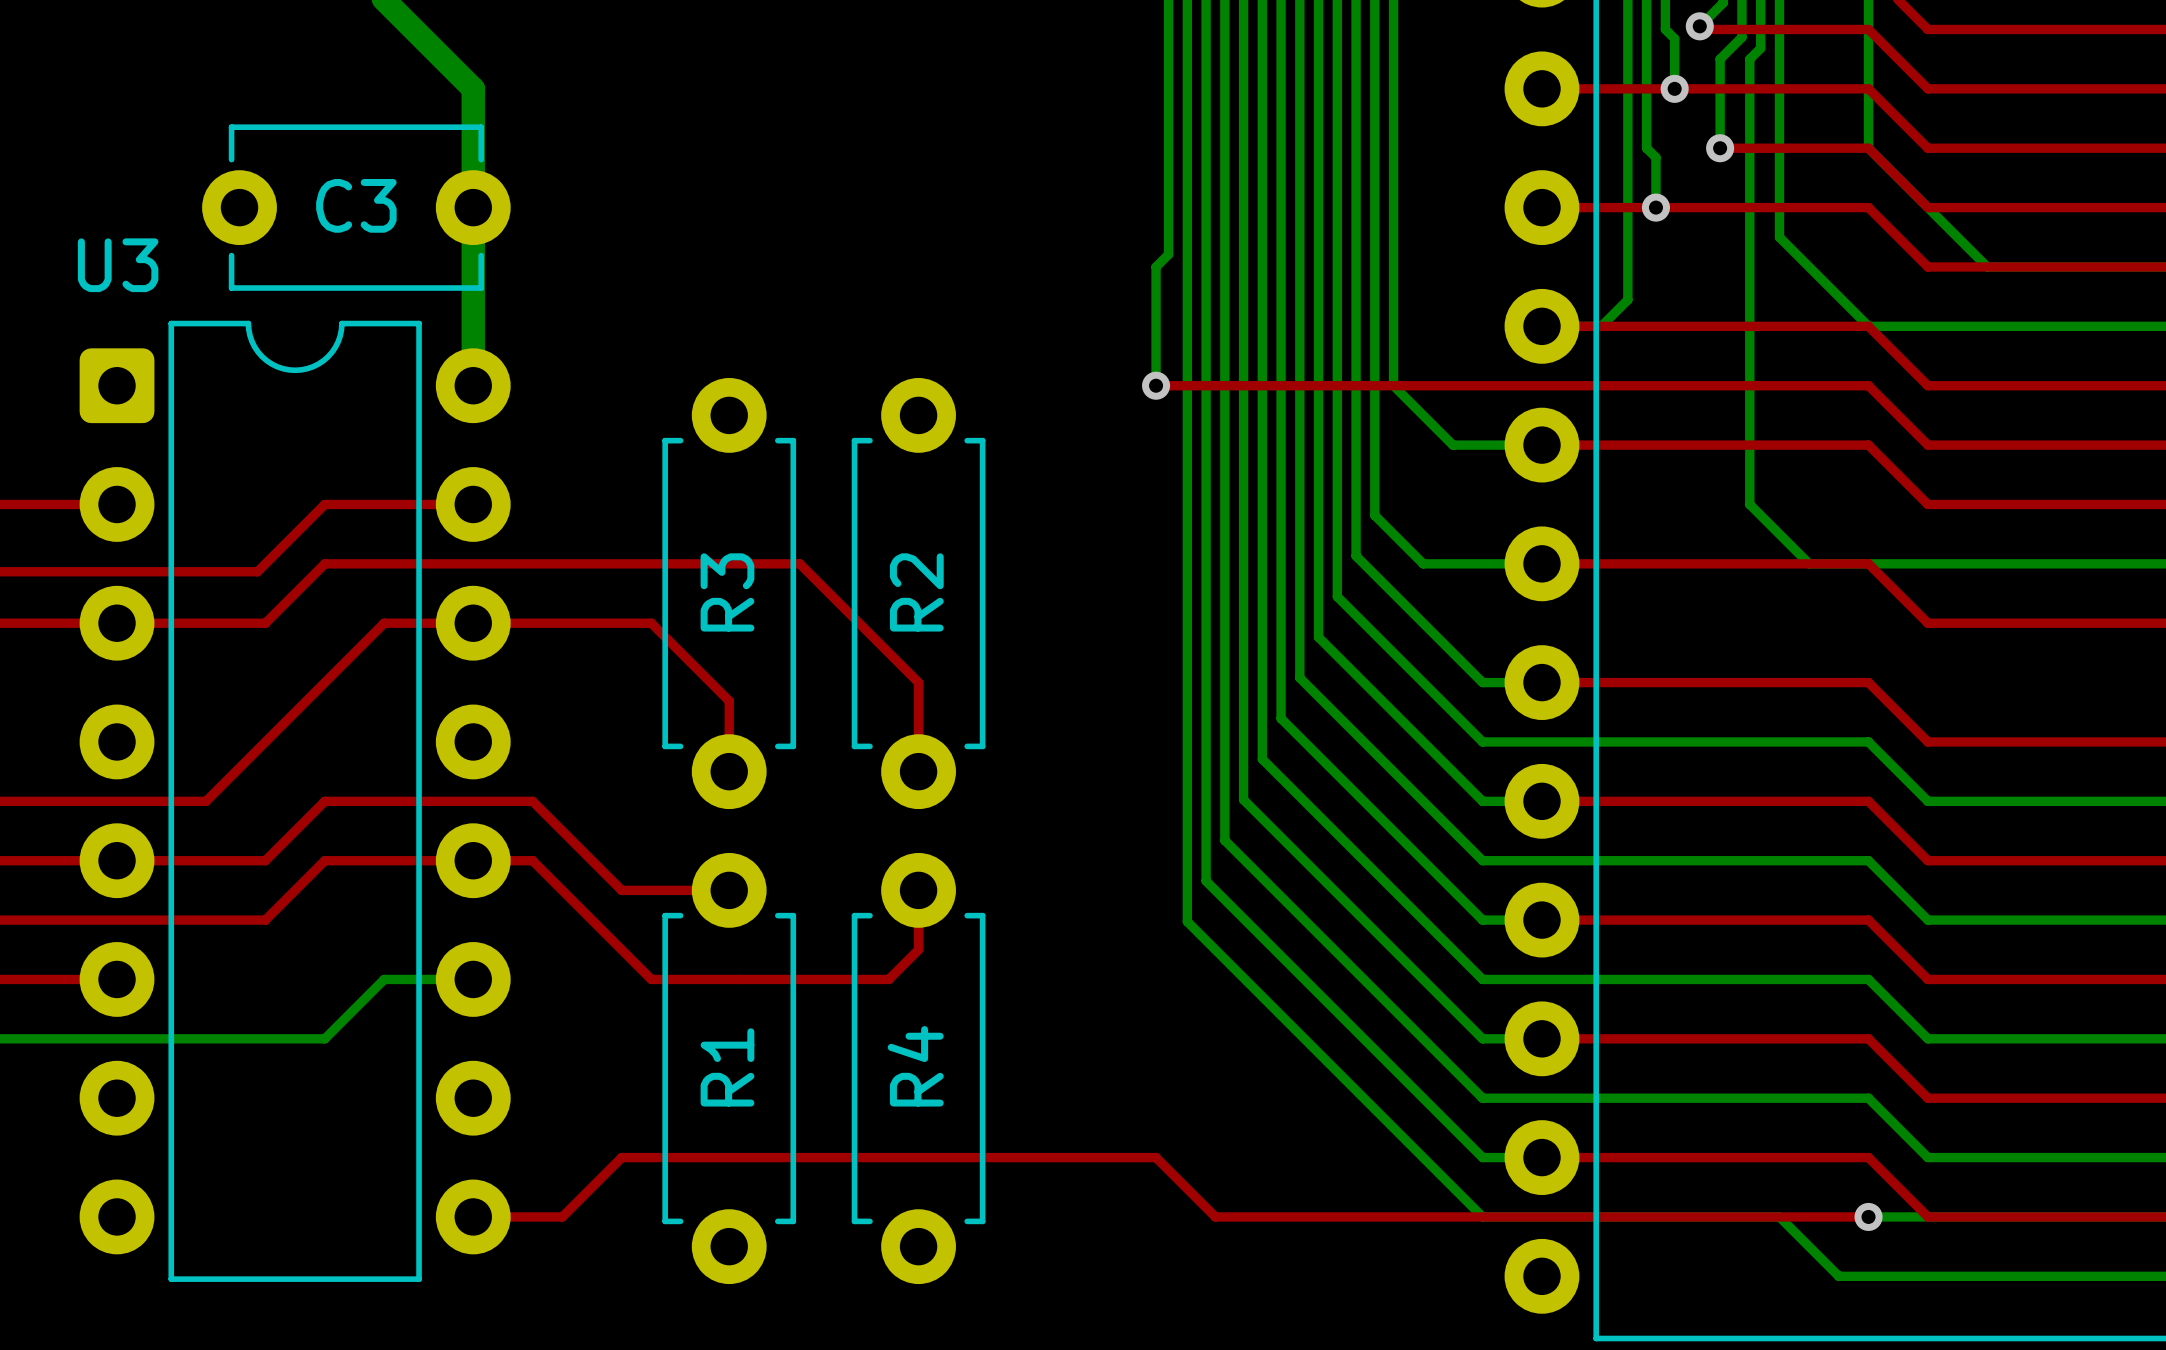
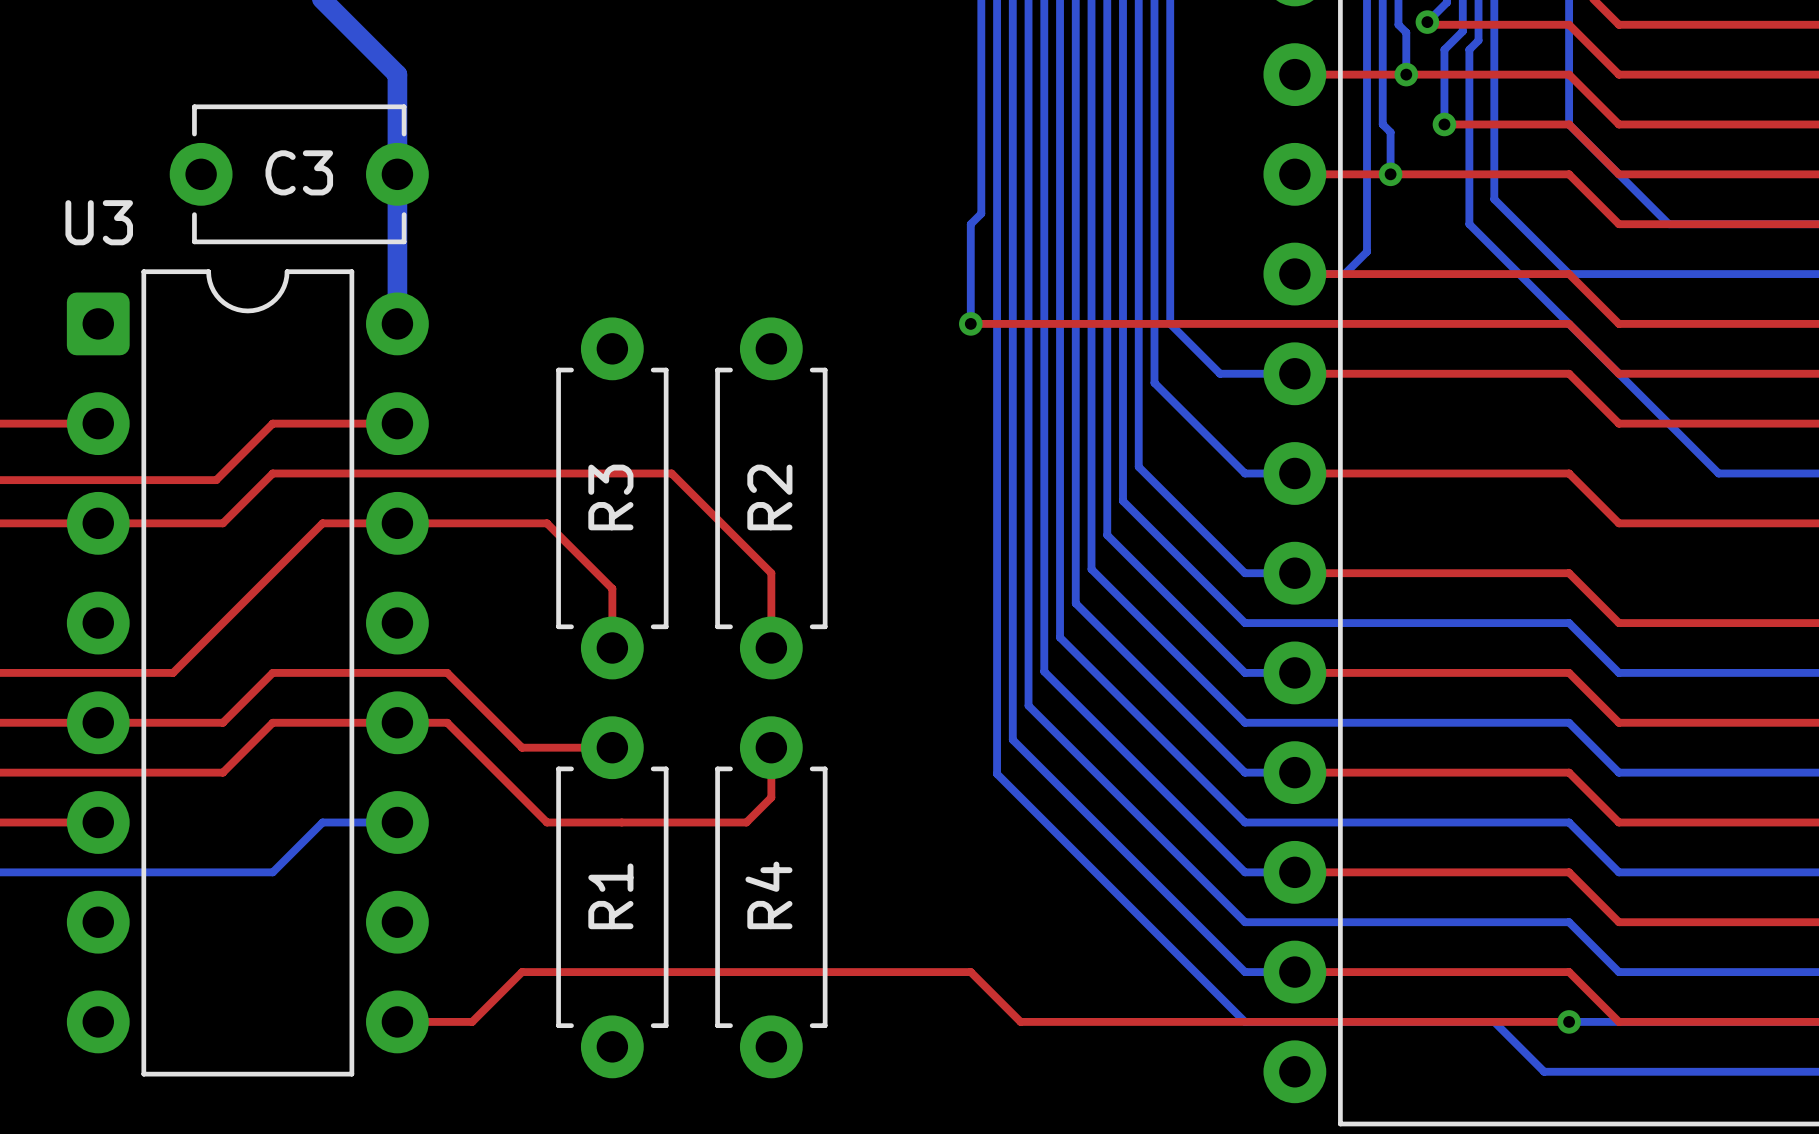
bottom track: (1749, 266) (1749, 504) (1809, 563) (2046, 563) -> (1469, 224) (1718, 473)
bottom track: (1374, 456) (1374, 515) (1423, 563) (1482, 563) -> (1154, 382) (1245, 473)

